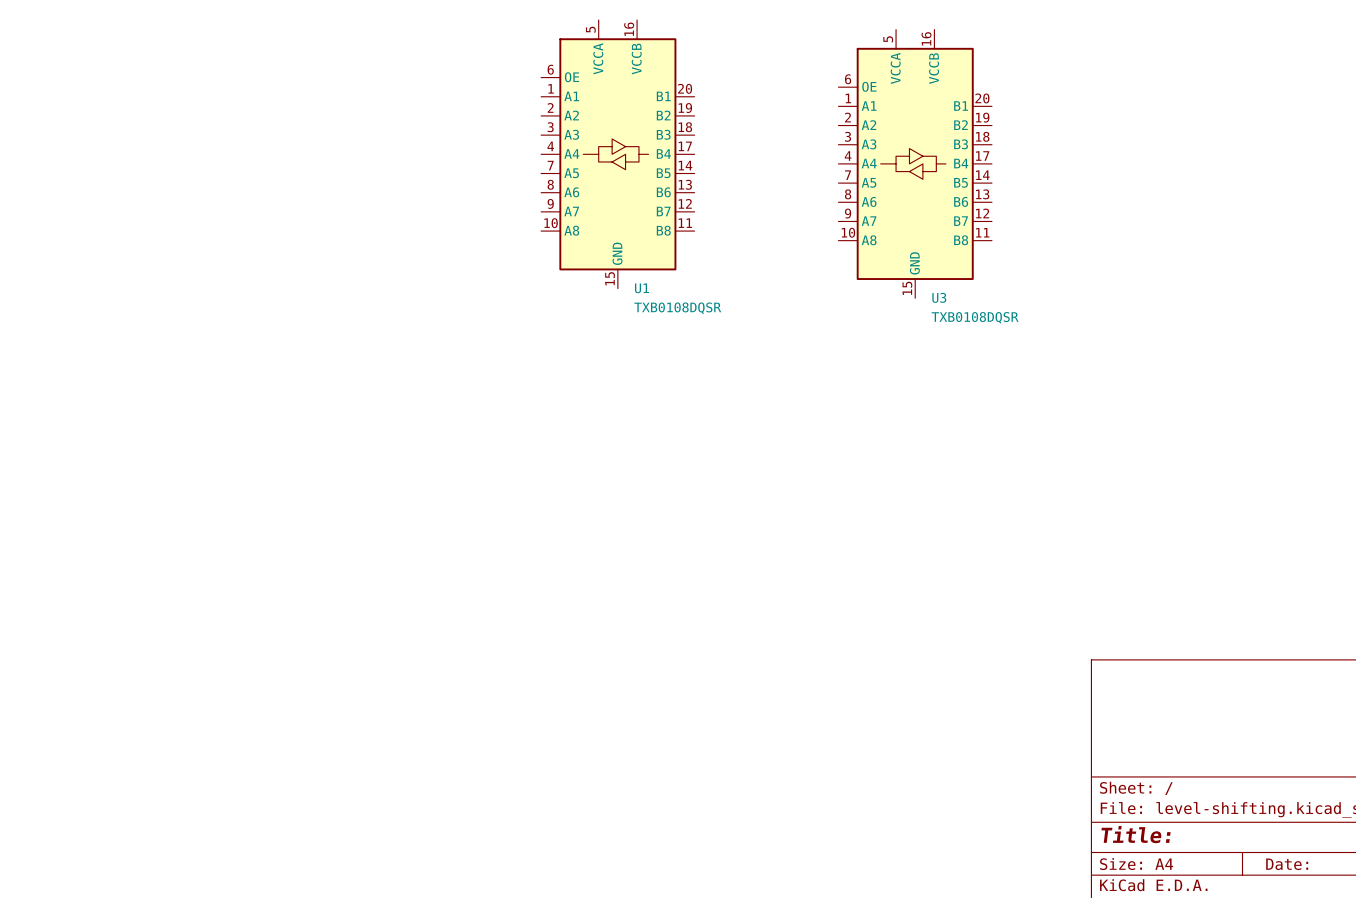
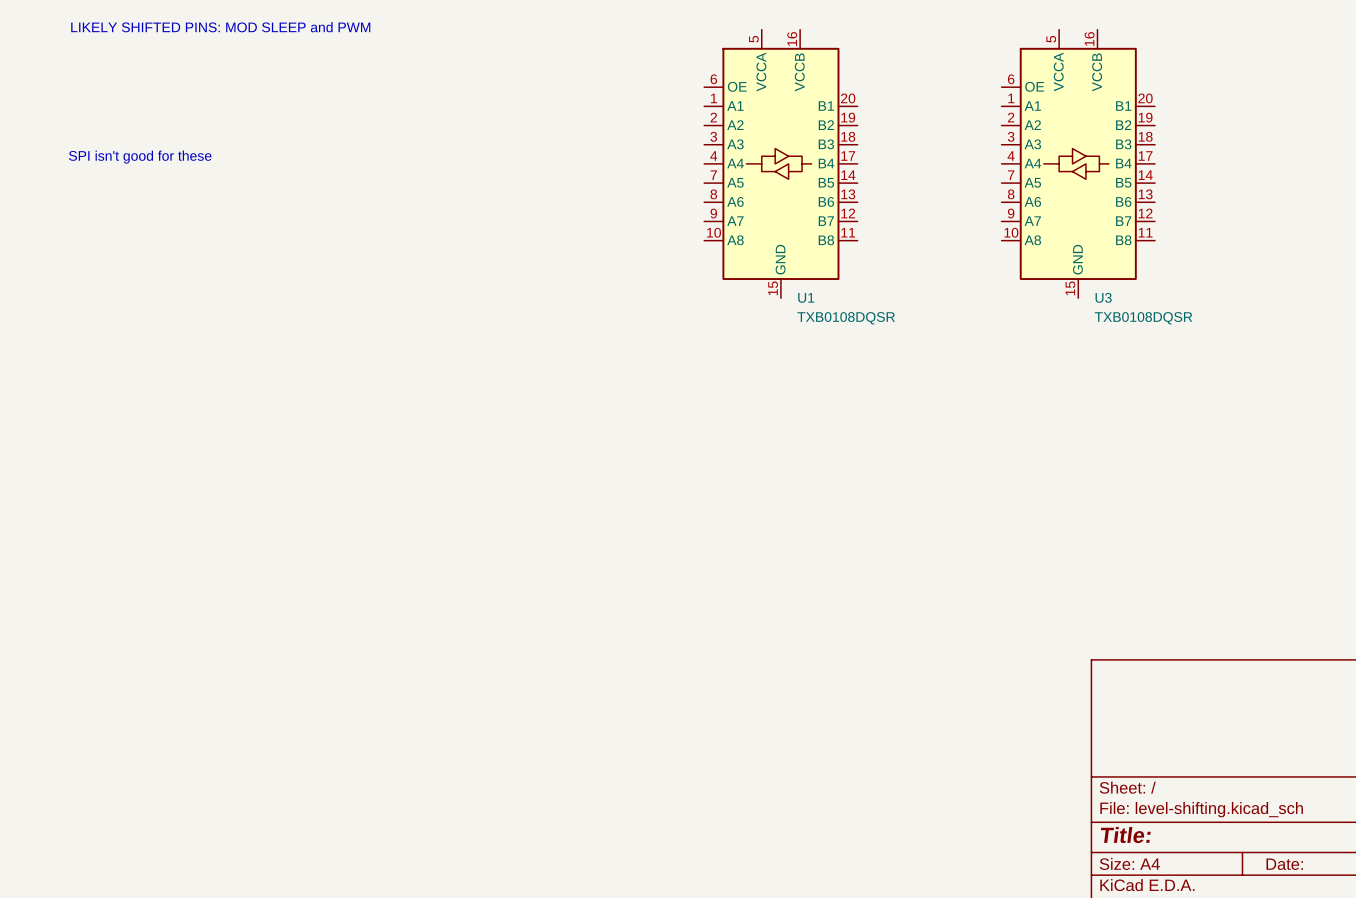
text: none -> LIKELY SHIFTED PINS: MOD SLEEP and PWM (220, 27)
U1 position: (617, 154) -> (780, 163)
text: none -> SPI isn't good for these (140, 157)
U3 position: (915, 163) -> (1078, 163)

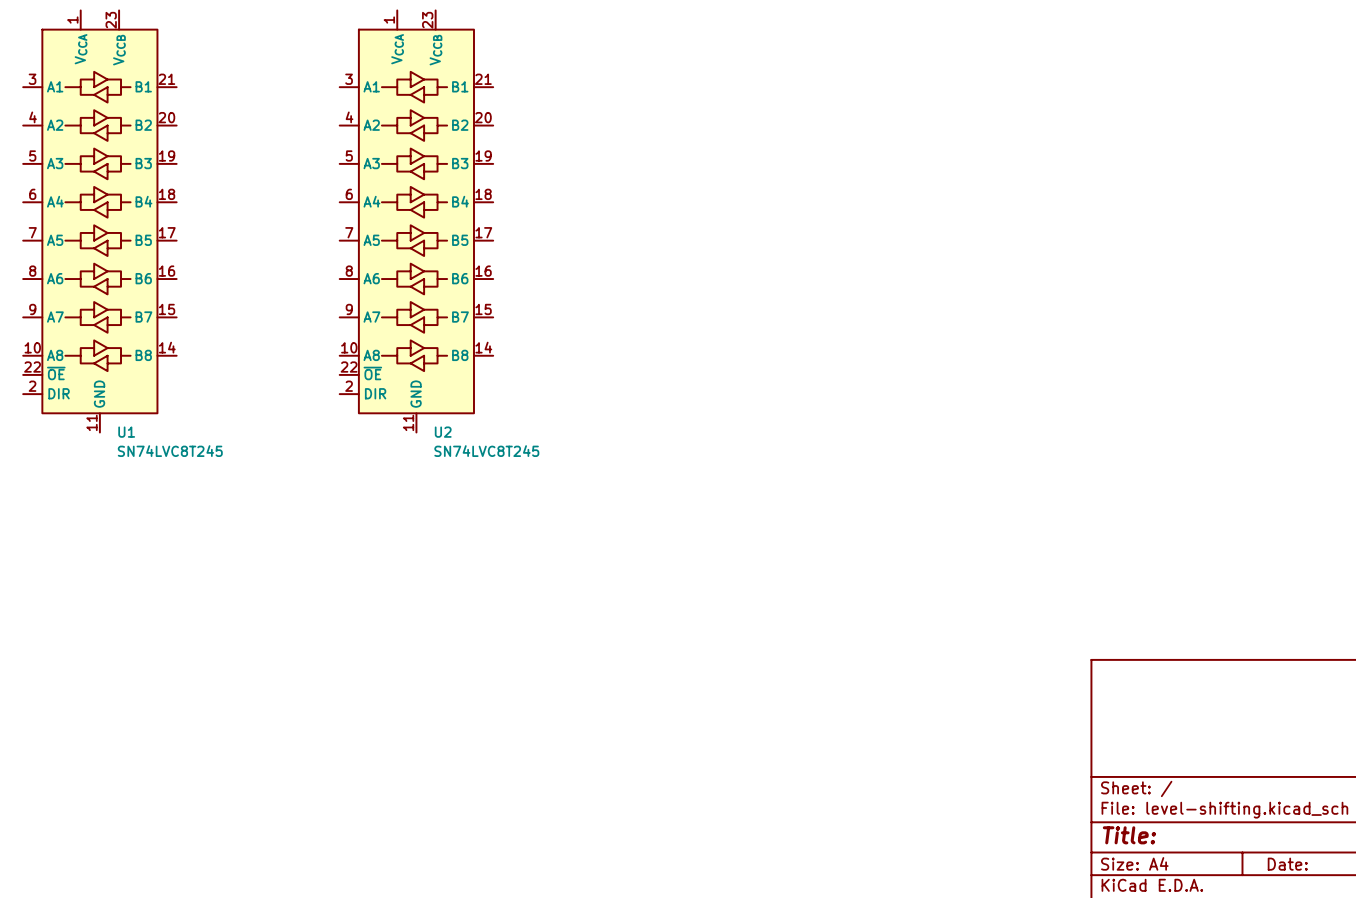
text: LIKELY SHIFTED PINS: MOD SLEEP and PWM (220, 27) -> none
U1 symbol: [704, 29, 858, 299] -> [23, 10, 177, 433]
text: SPI isn't good for these (140, 157) -> none
U3: TXB0108DQSR (1078, 163) -> none
U2: none -> SN74LVC8T245 (416, 221)
U1 name position: U1 (806, 297) -> U1 (126, 432)
U1 value: TXB0108DQSR (846, 318) -> SN74LVC8T245 (170, 451)

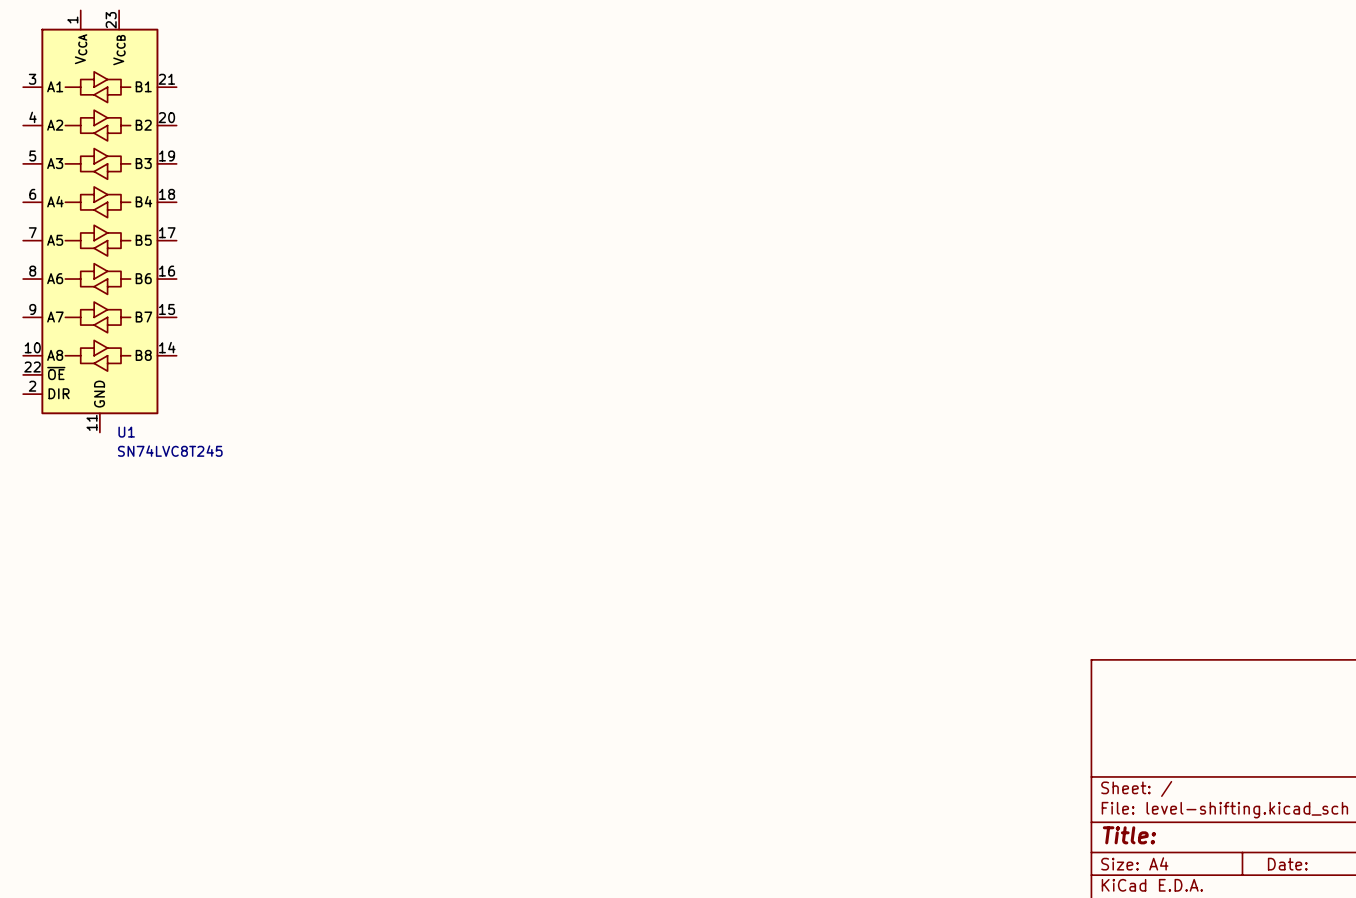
U2: SN74LVC8T245 (416, 221) -> none

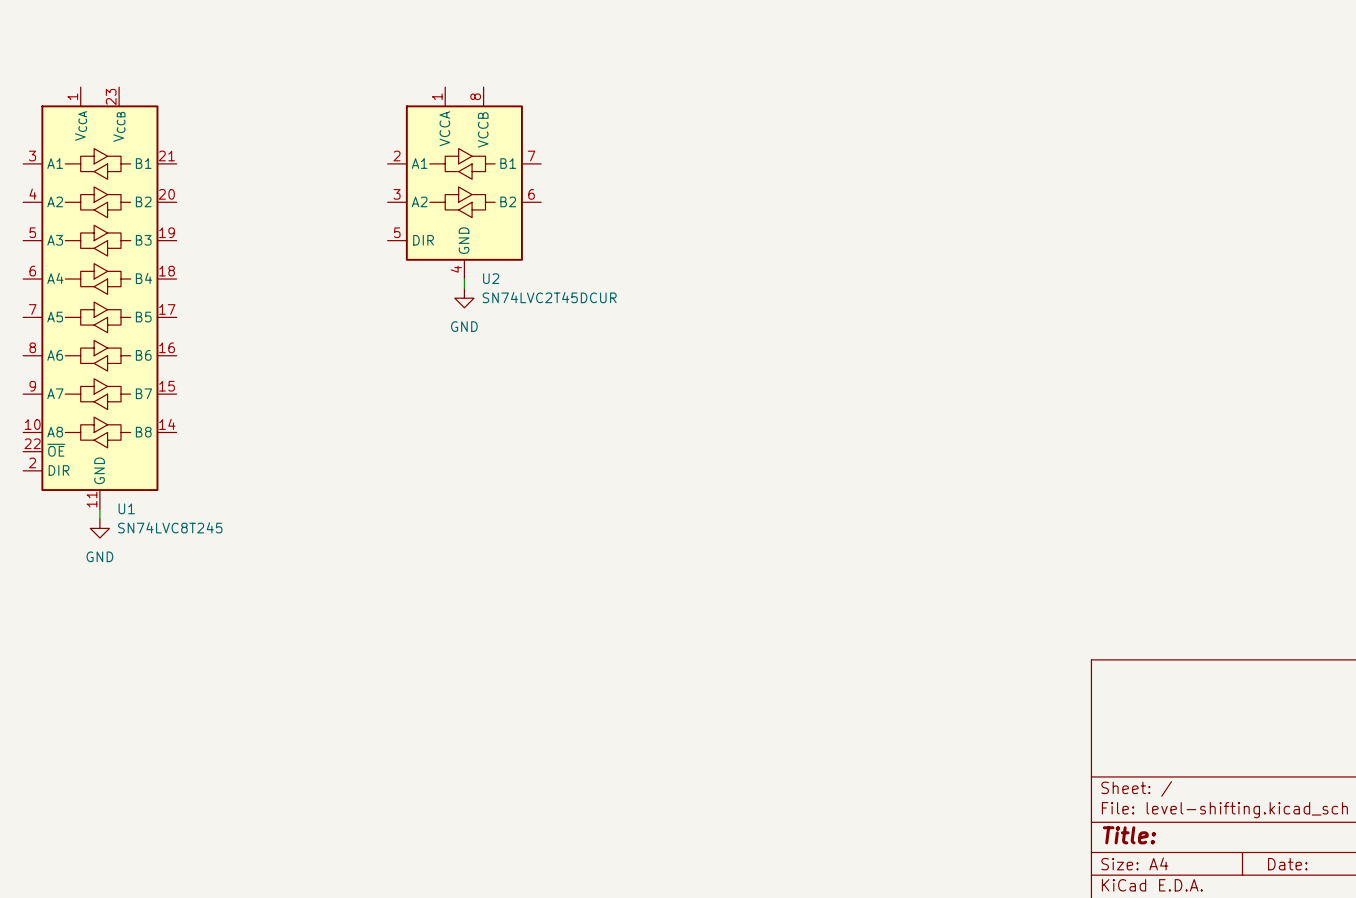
U2: none -> SN74LVC2T45DCUR (464, 183)
U1 position: (99, 221) -> (99, 298)
wire: none -> (464, 279) (464, 288)
power symbol: none -> GND (464, 298)
wire: none -> (99, 509) (99, 518)
power symbol: none -> GND (99, 528)

